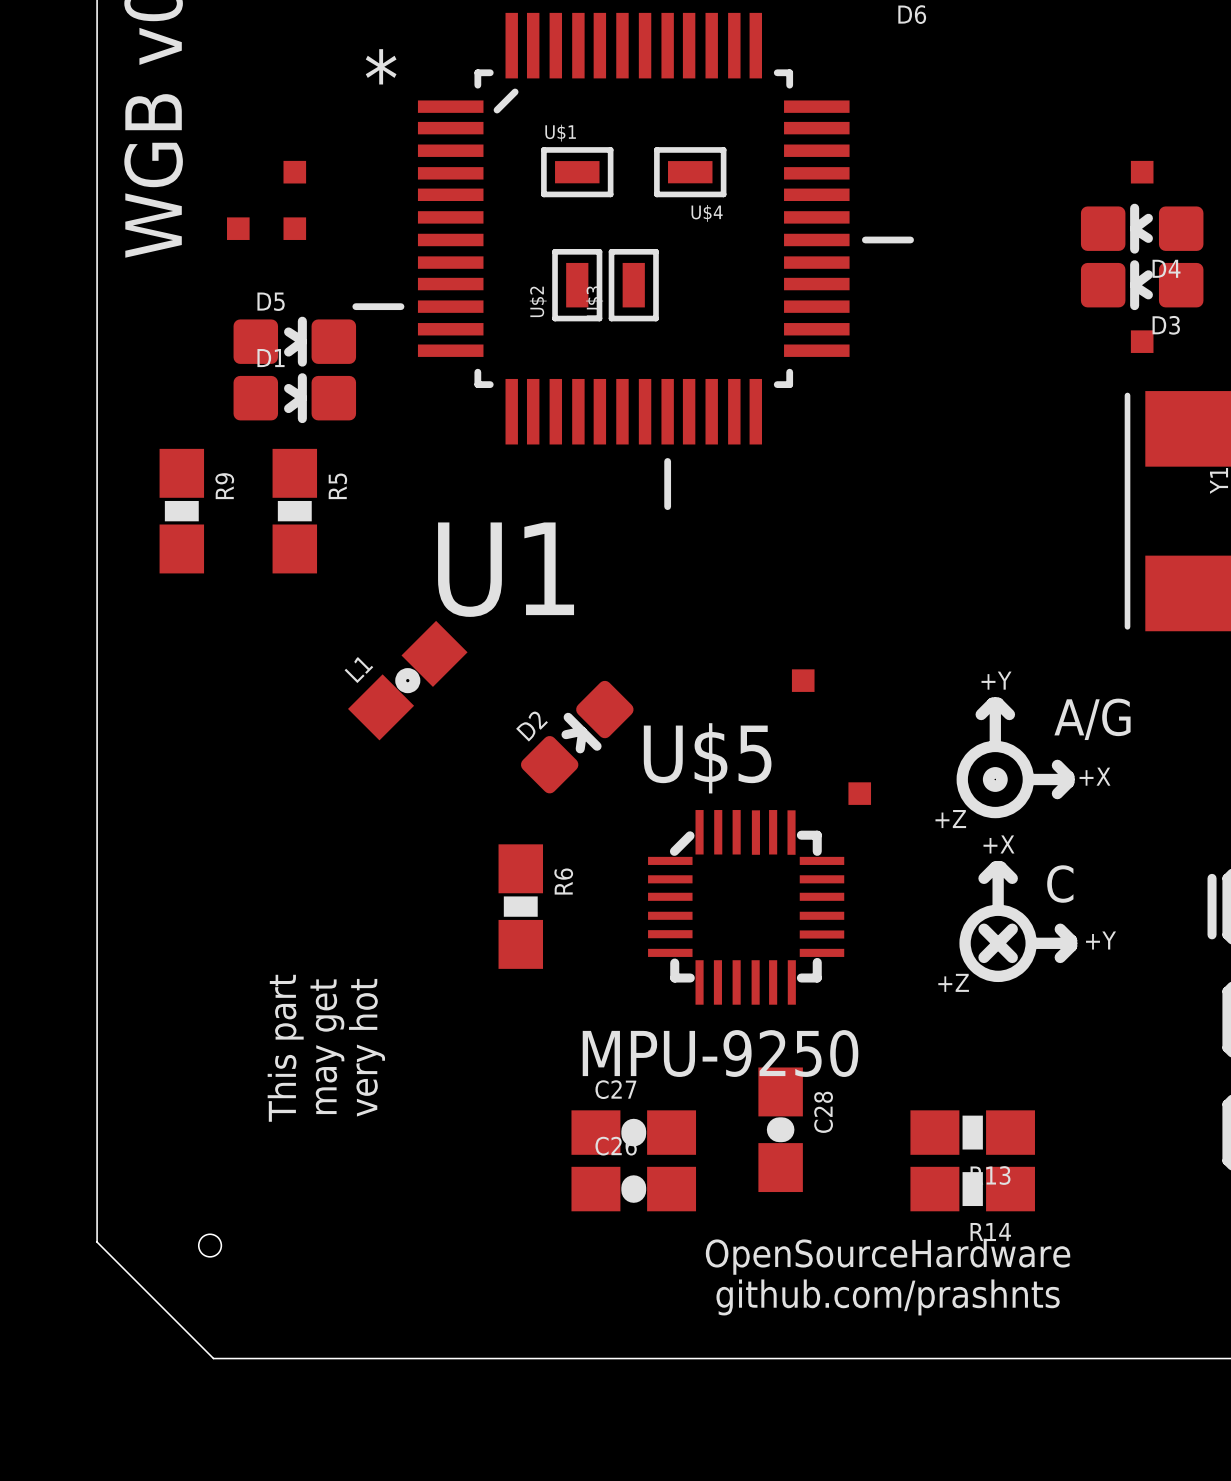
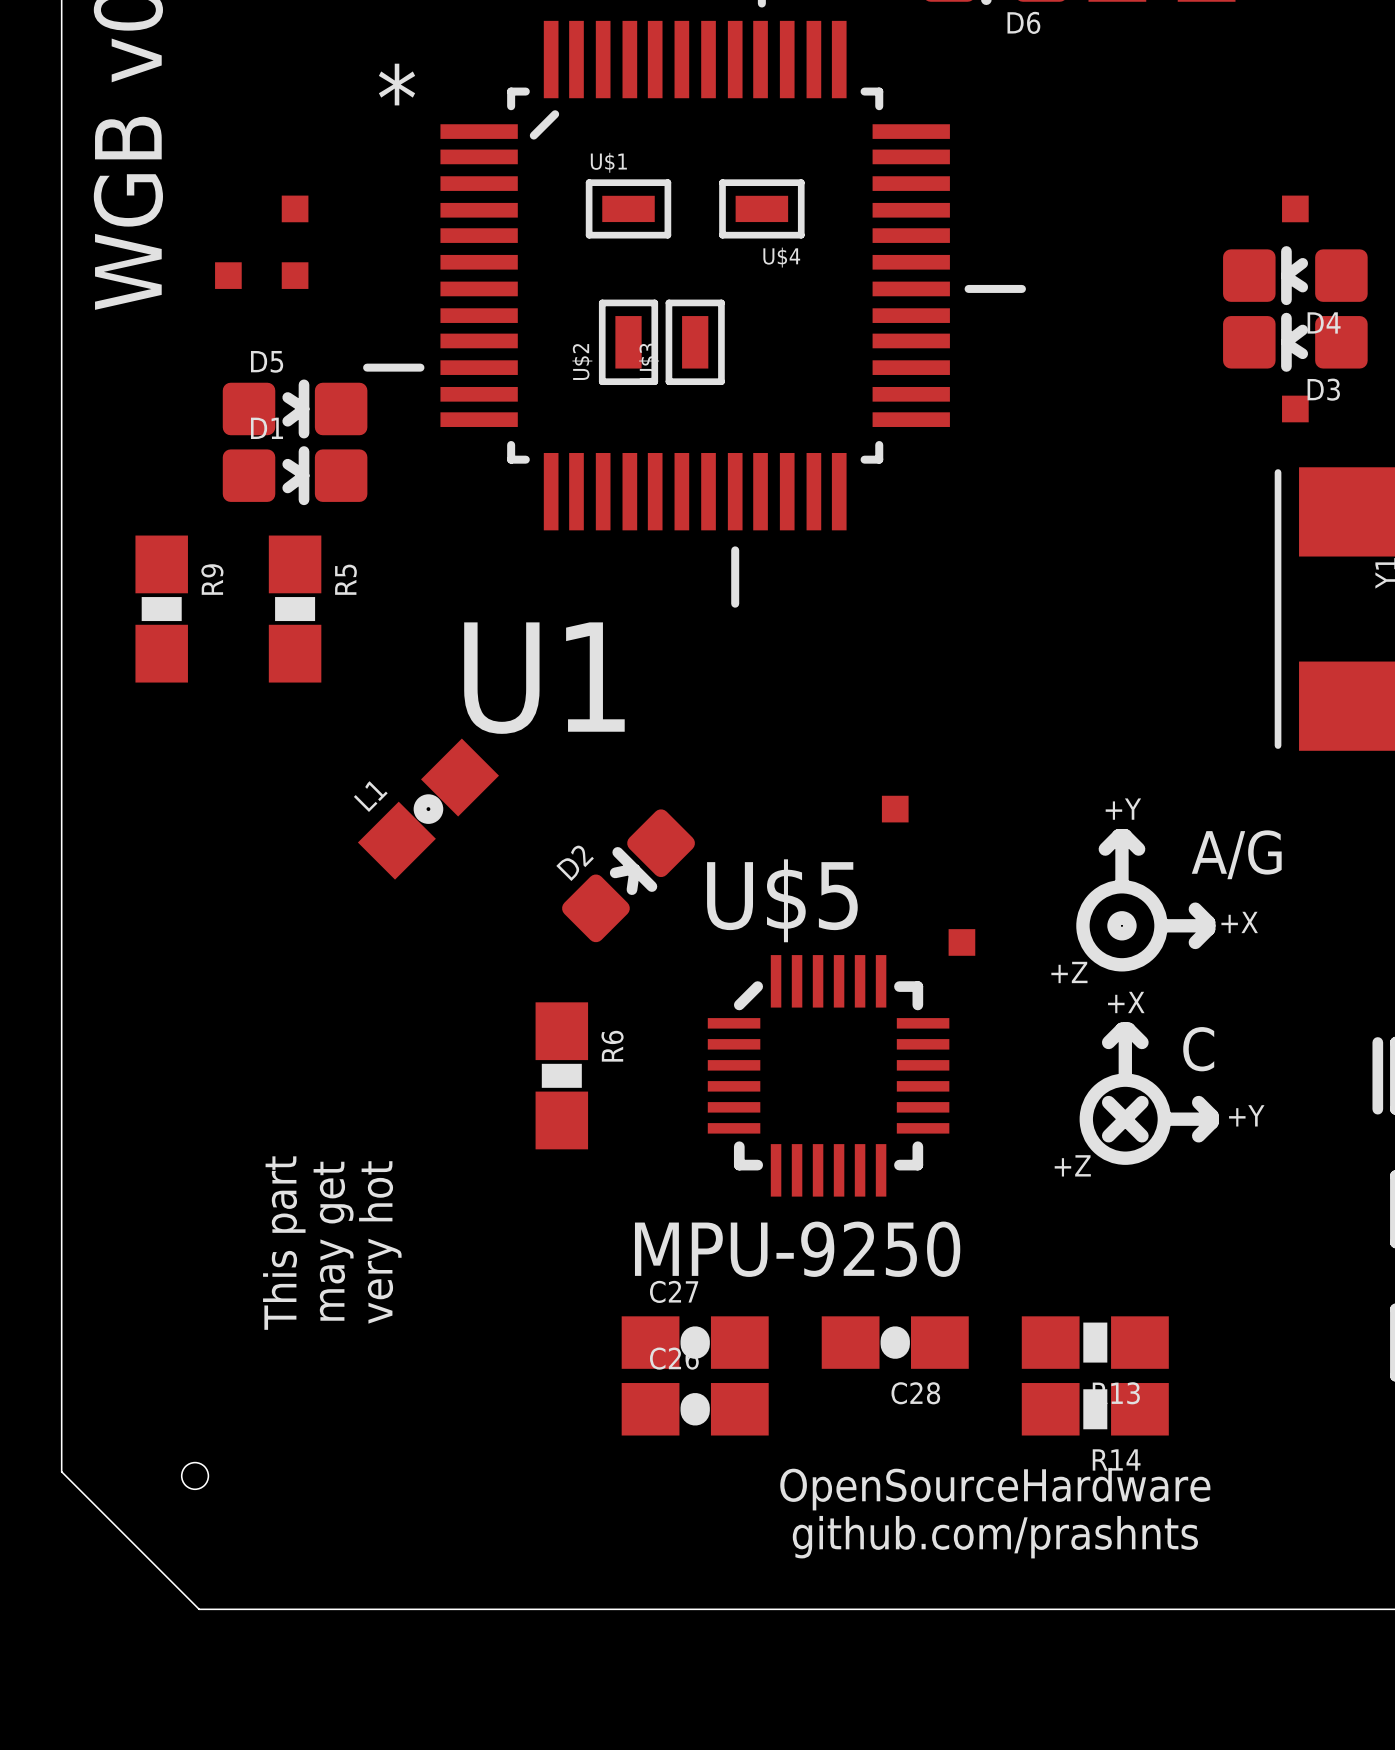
U$5 footprint: [648, 810, 845, 1005] -> [707, 955, 950, 1197]
C28 rotation: 0° (780, 1129) -> 90° clockwise (895, 1342)

